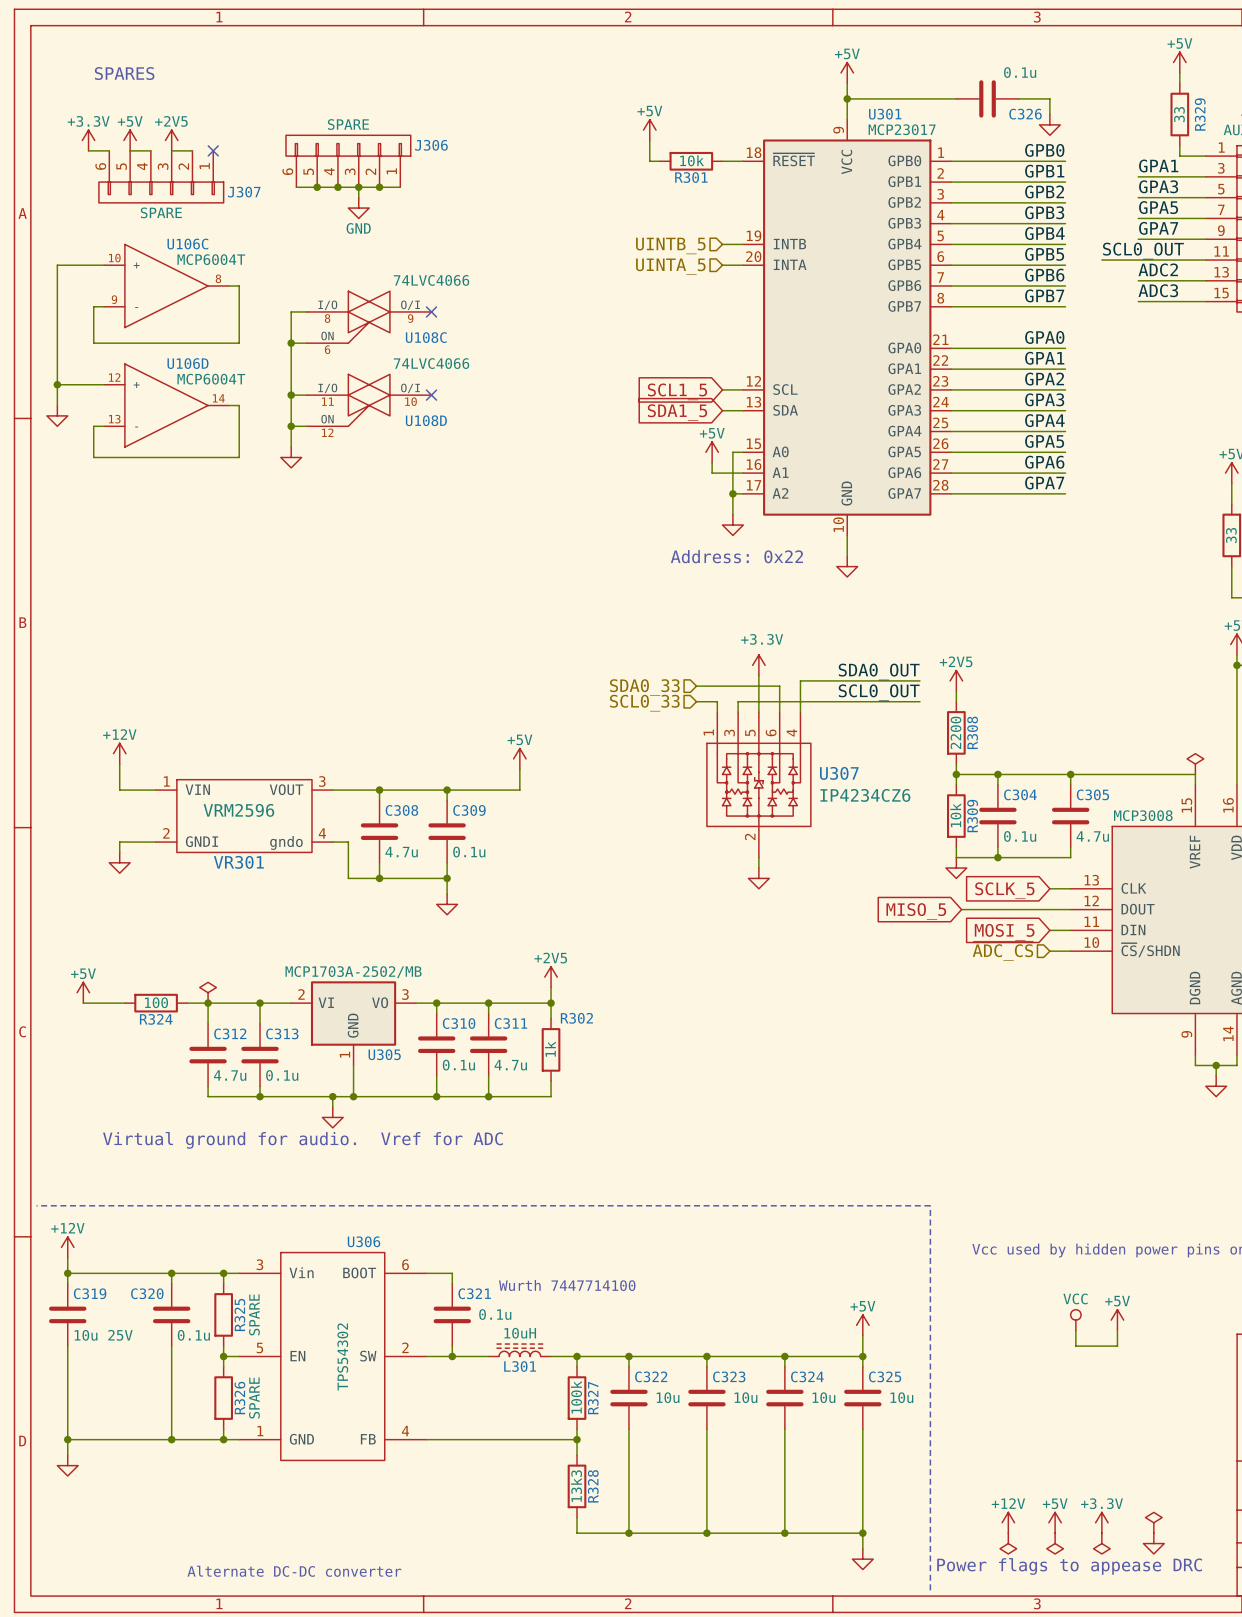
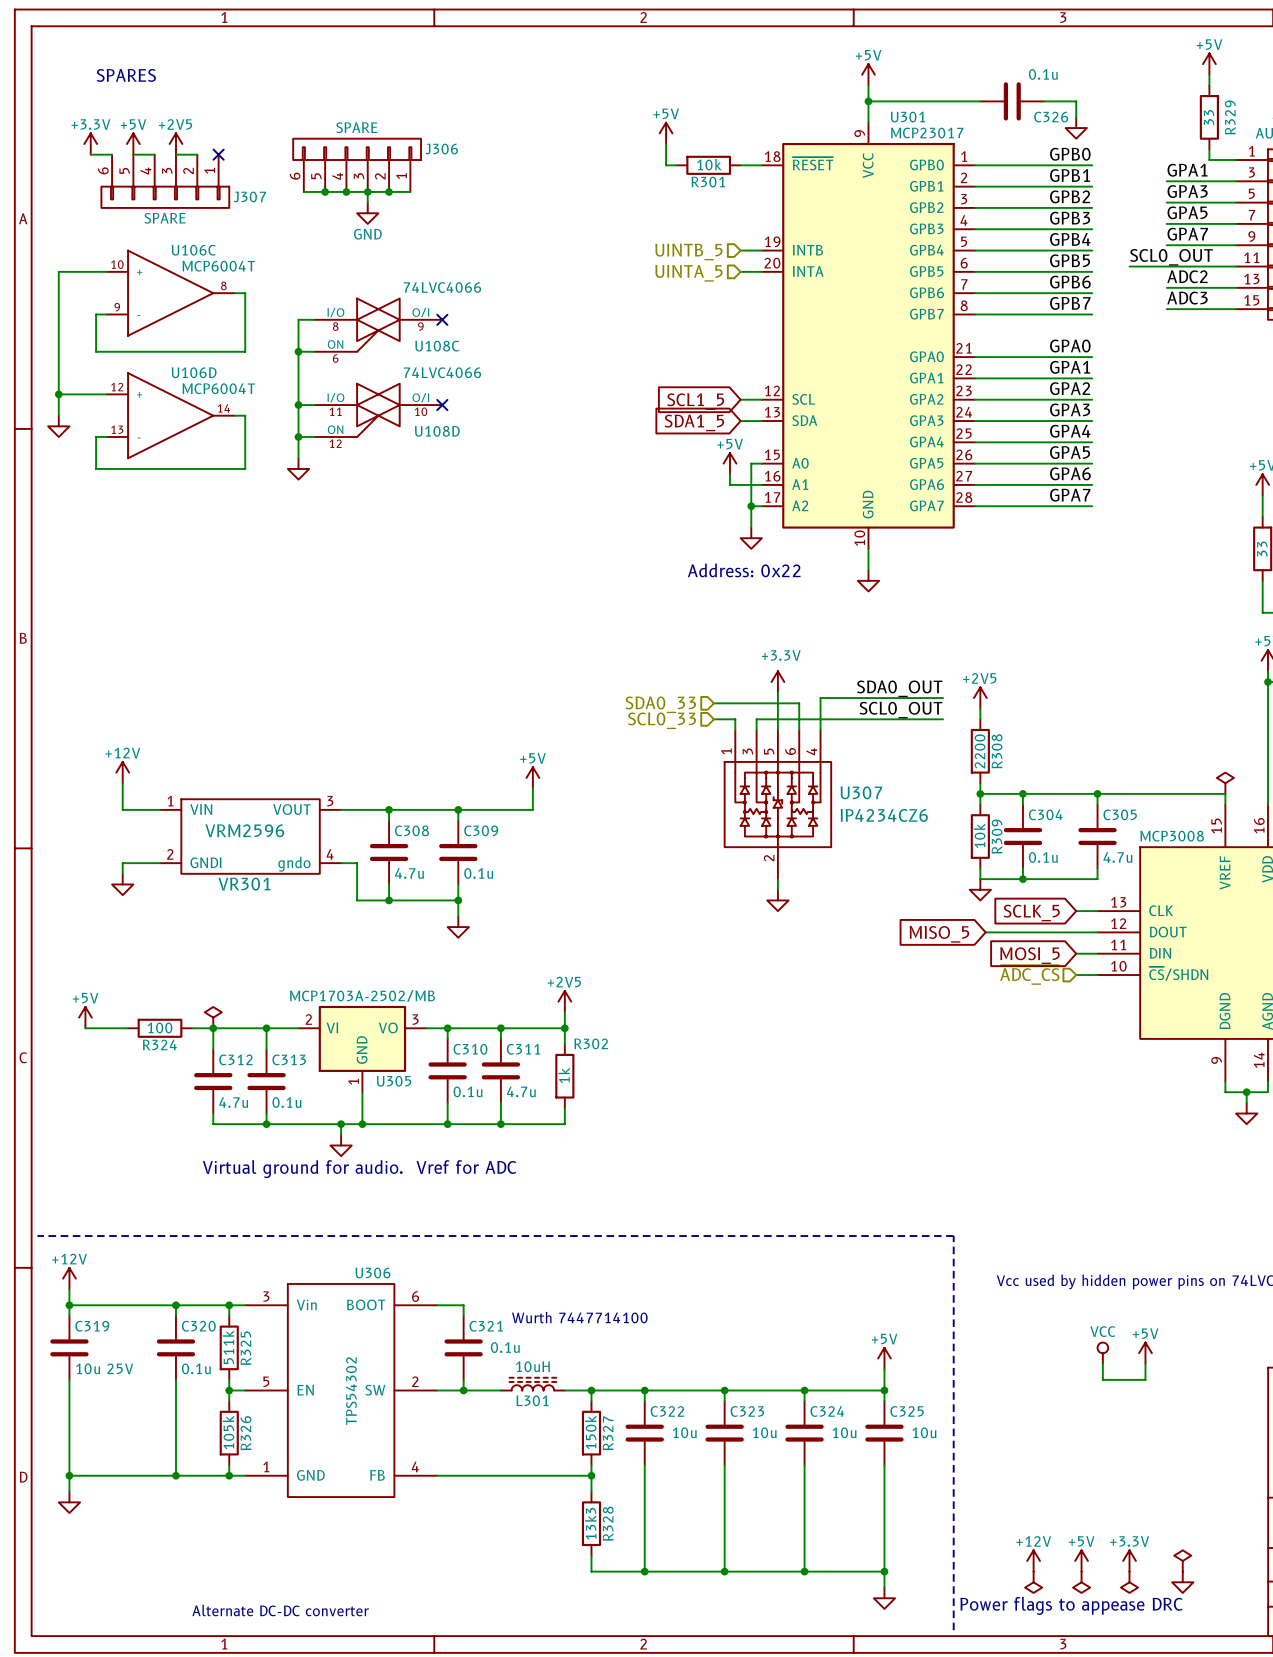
C320 name position: C320 (147, 1293) -> C320 (198, 1326)
R325 value: SPARE (254, 1314) -> 511k (228, 1347)
R327 value: 100k (576, 1397) -> 150k (590, 1432)
R326 value: SPARE (254, 1398) -> 105k (228, 1432)

